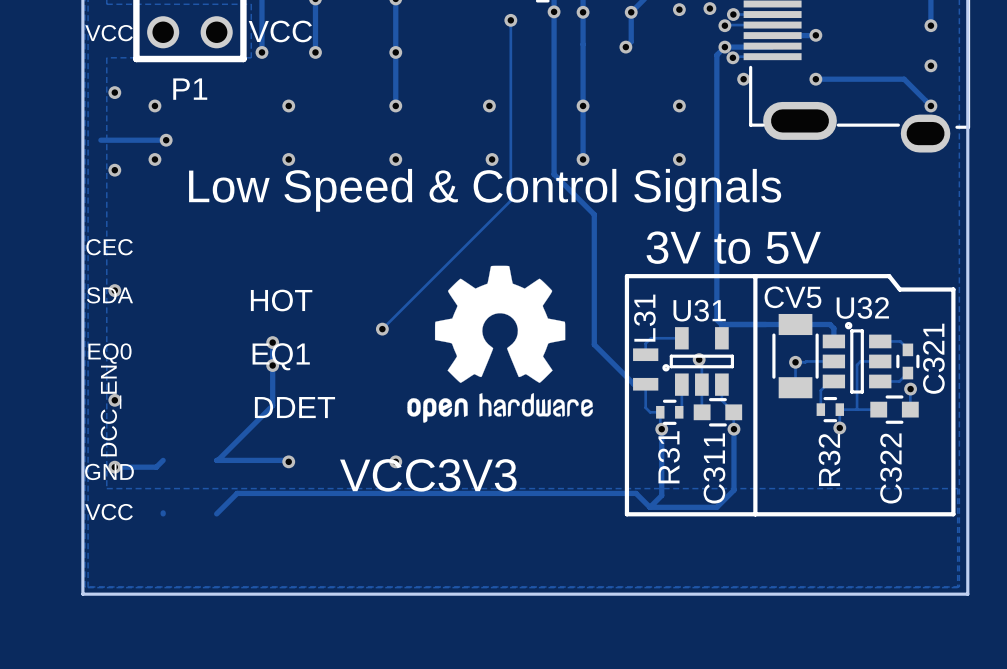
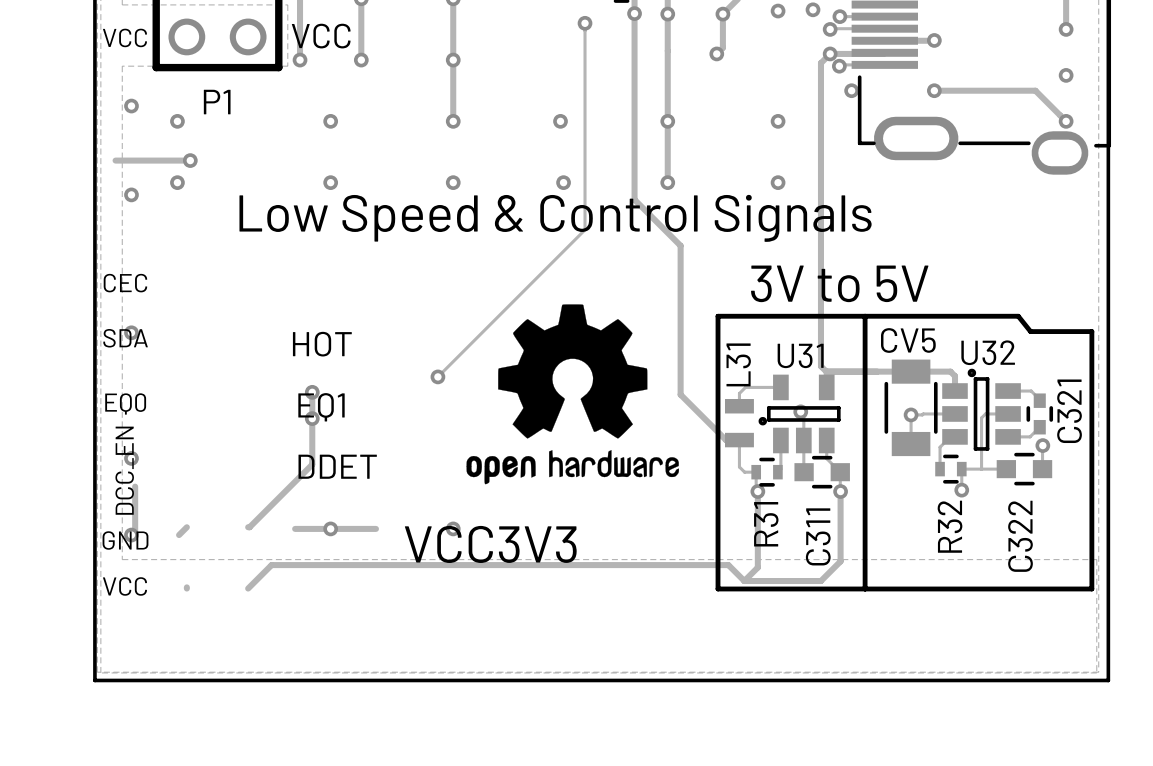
track: none -> (135, 486) (135, 534)
track: (217, 460) (287, 460) -> none
track: none -> (295, 528) (375, 528)
track: (114, 467) (156, 467) -> none

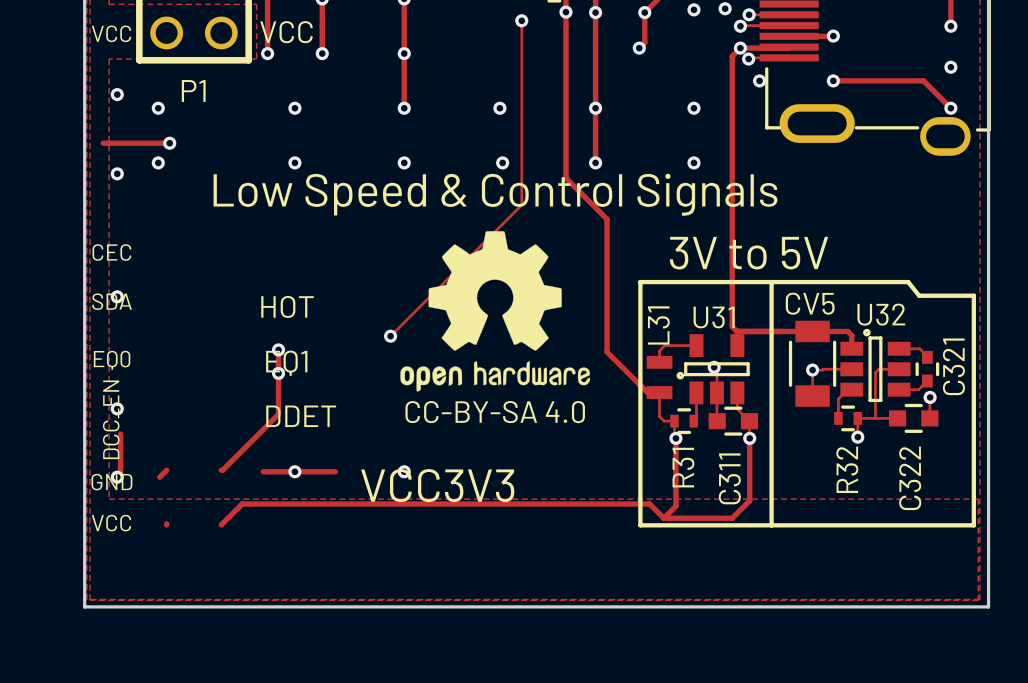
drawing position: (572, 394) -> (495, 311)
text: none -> CC-BY-SA 4.0 (495, 412)

